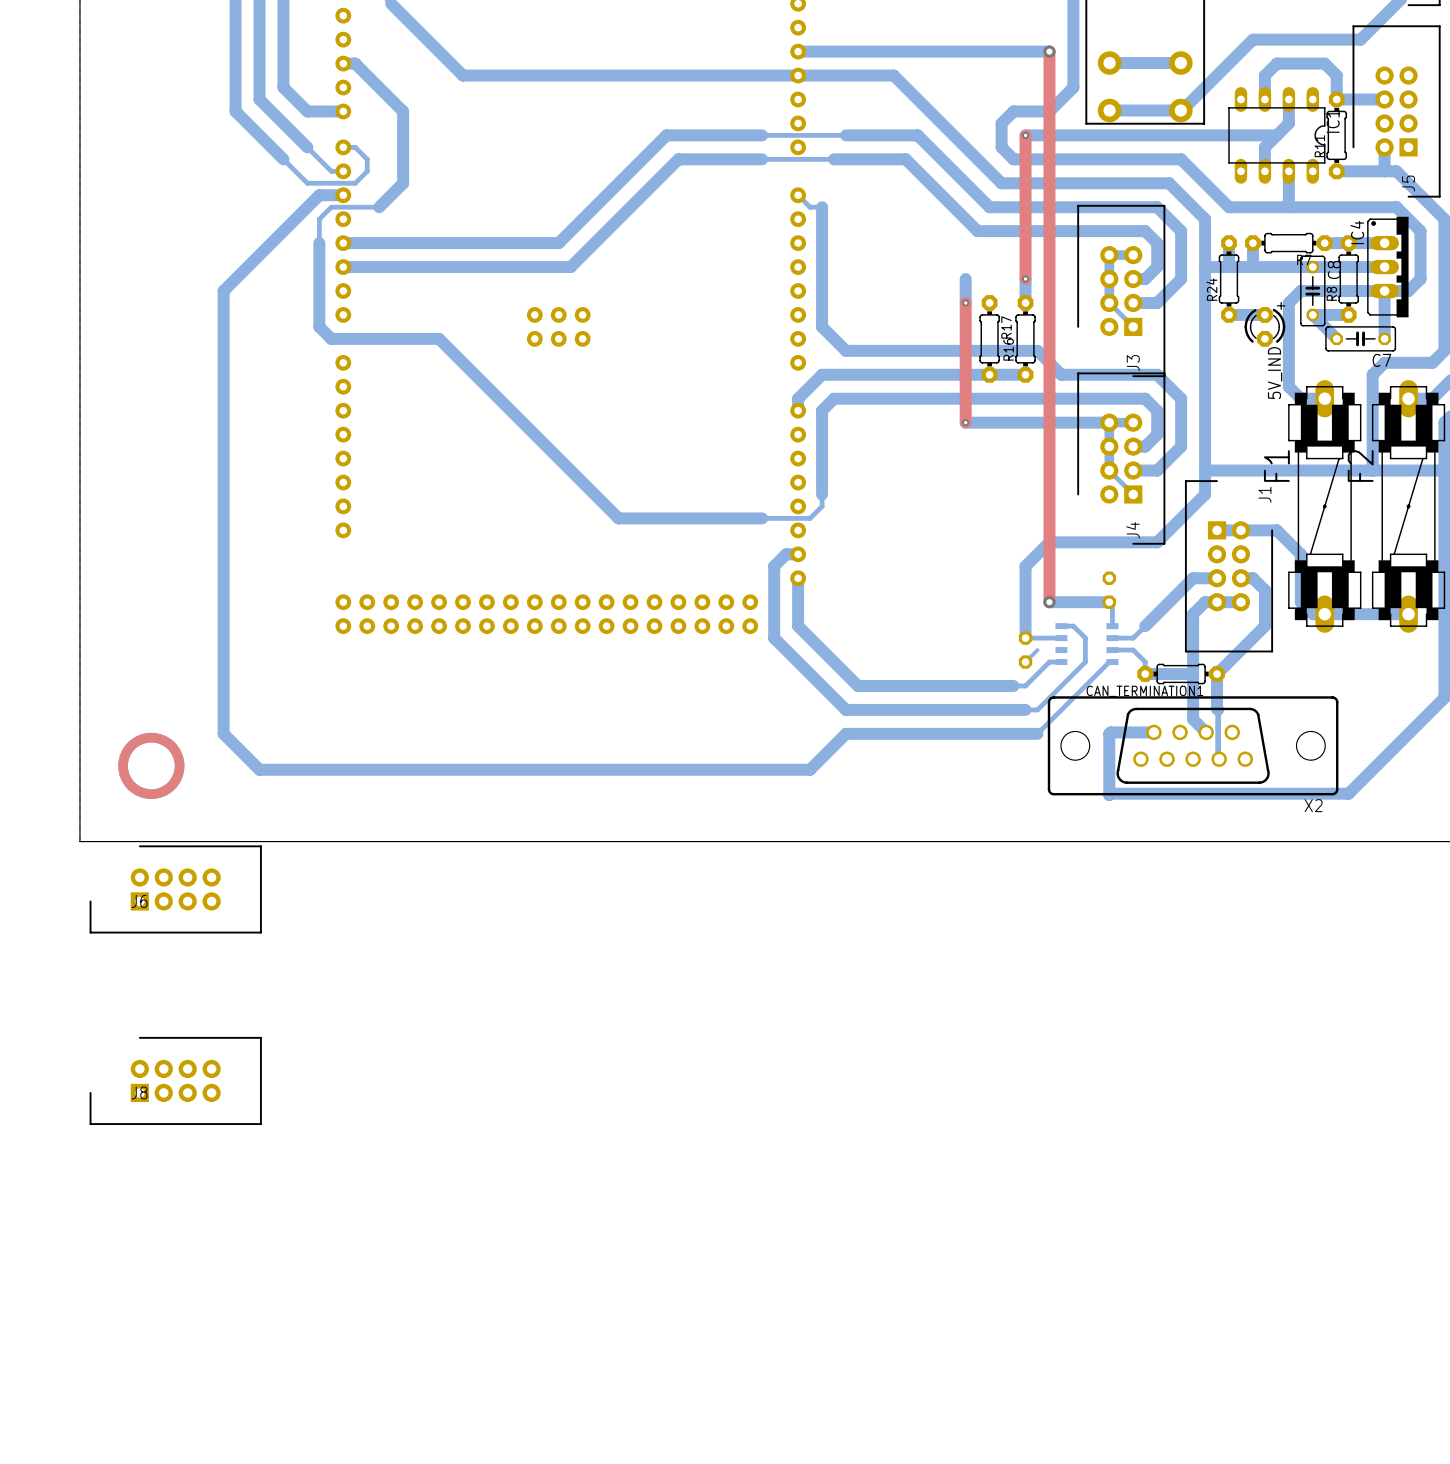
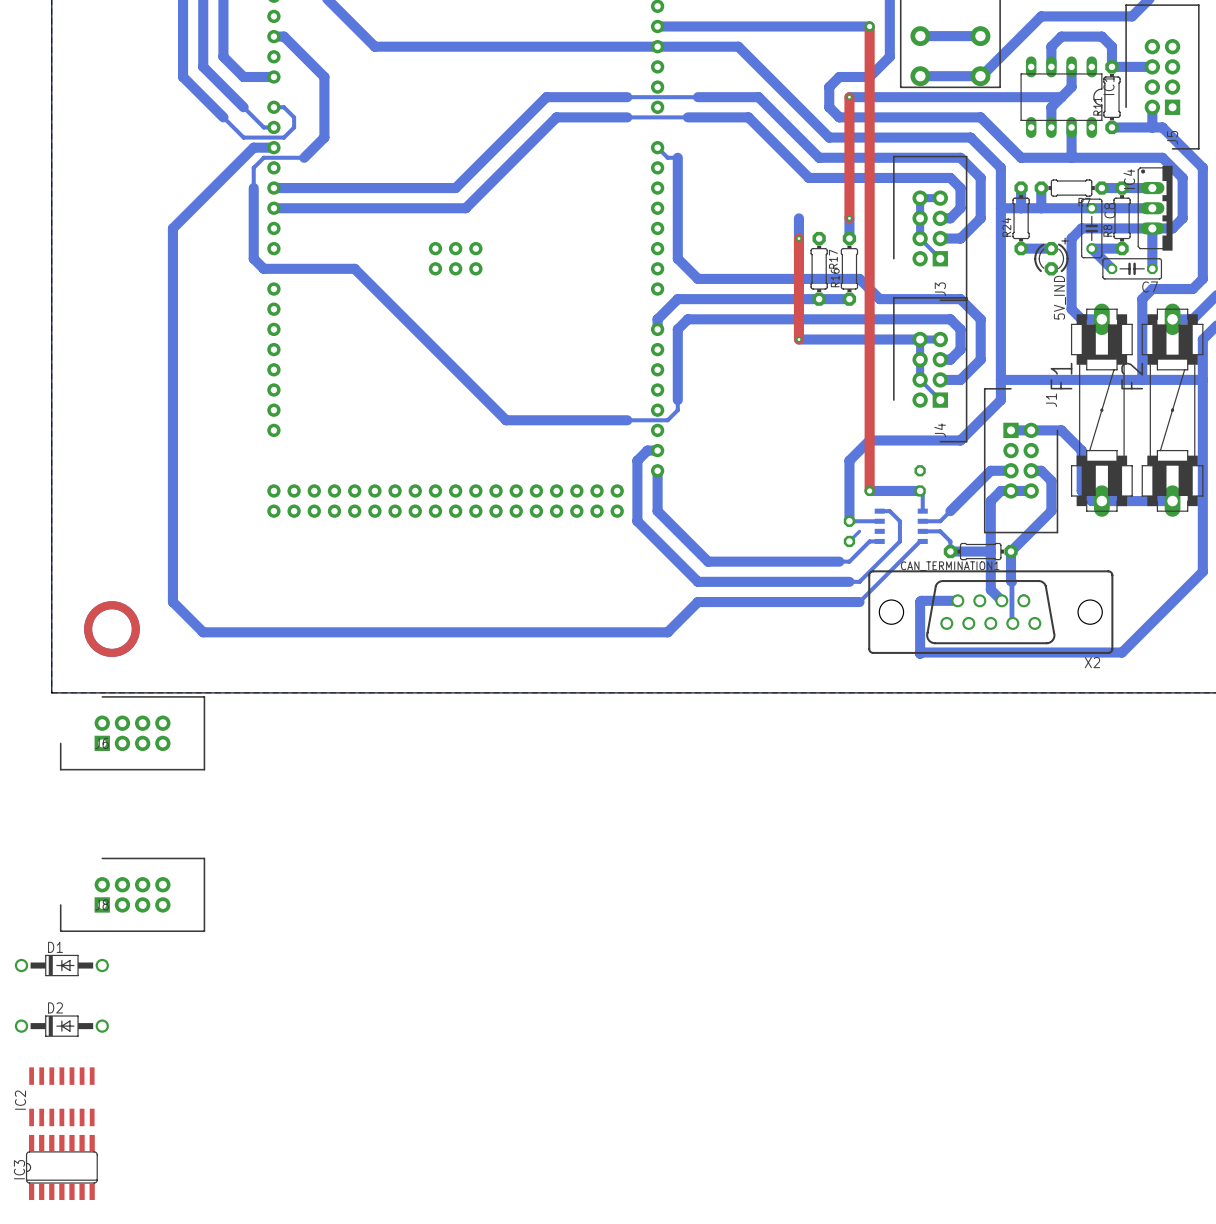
D1: none -> (61, 965)
D2: none -> (61, 1026)
IC2: none -> (61, 1096)
IC3: none -> (61, 1167)

